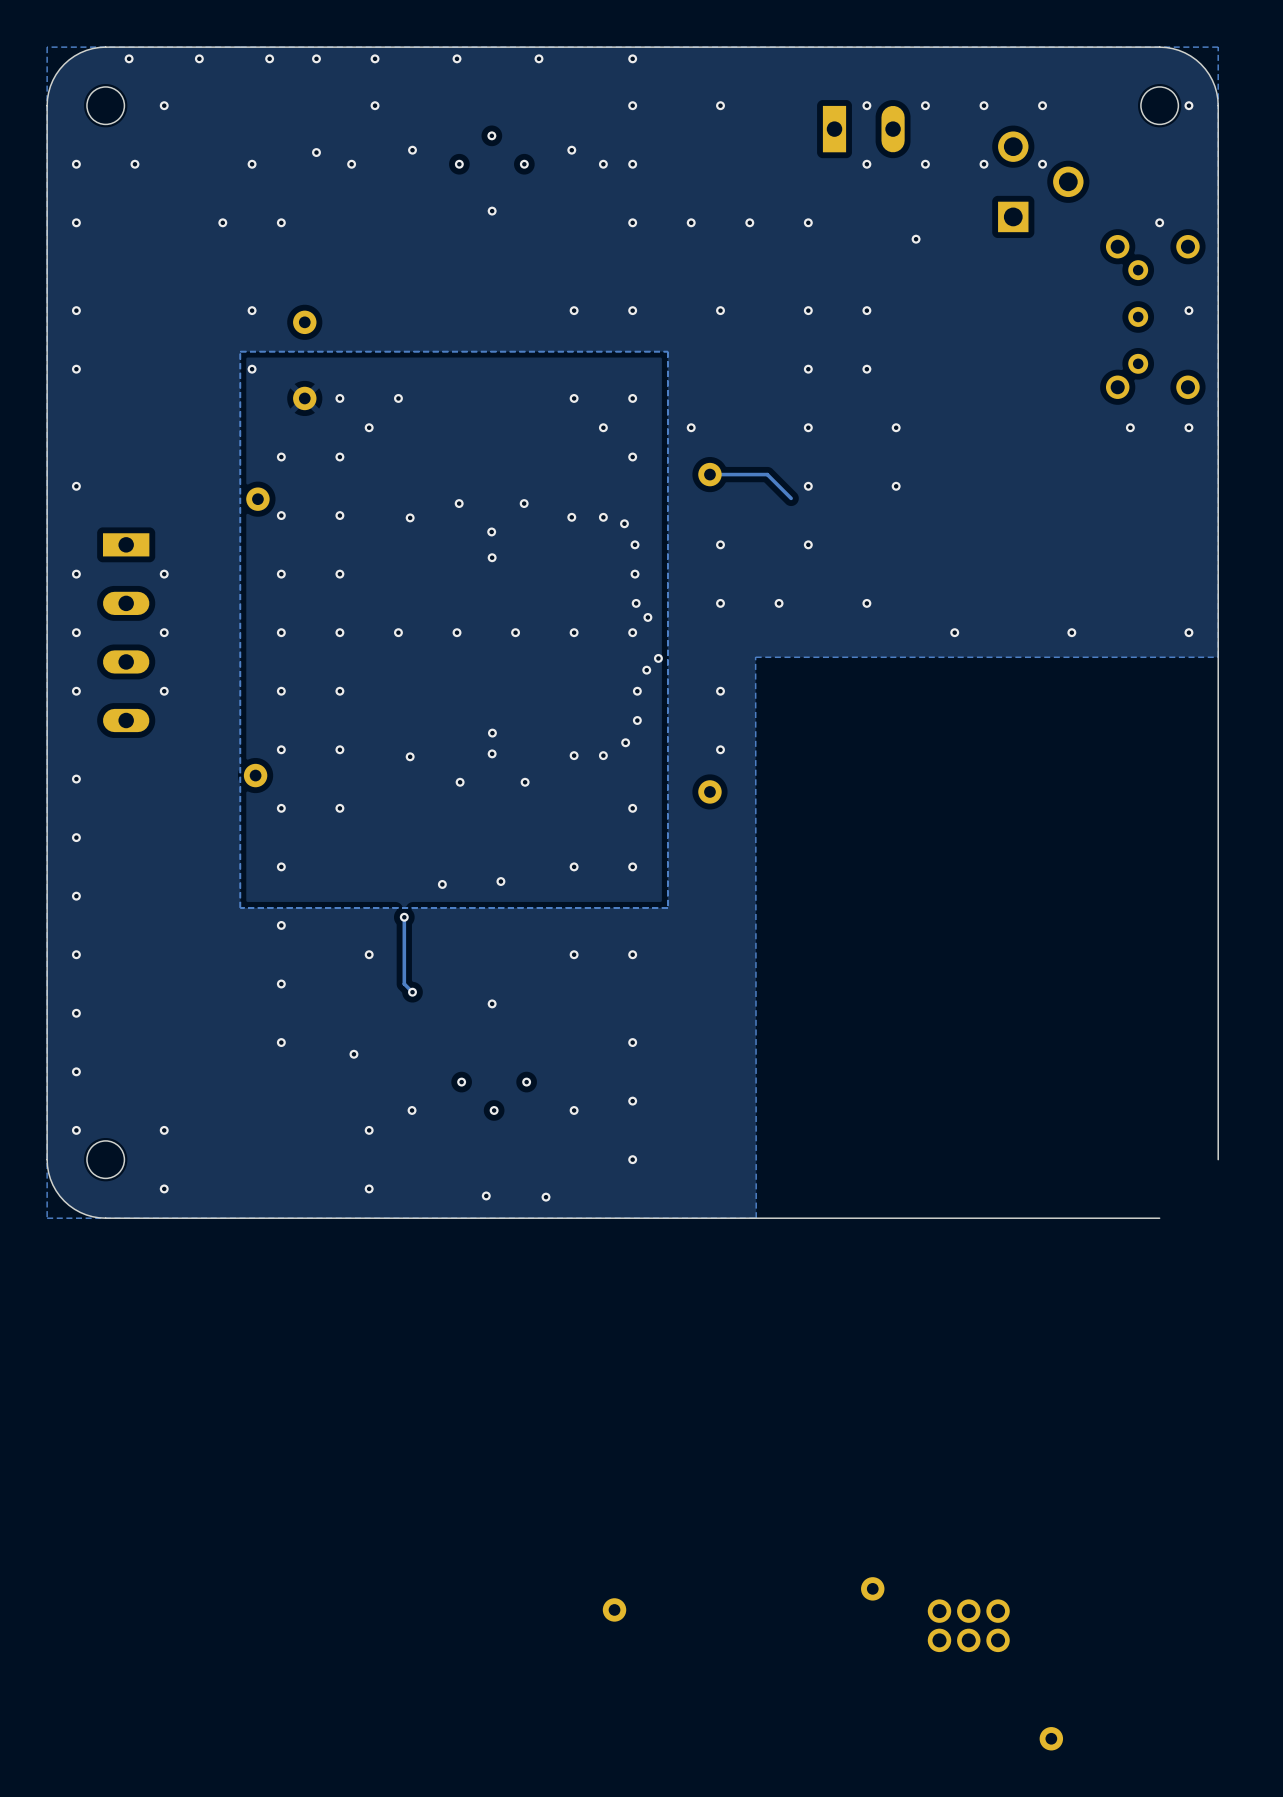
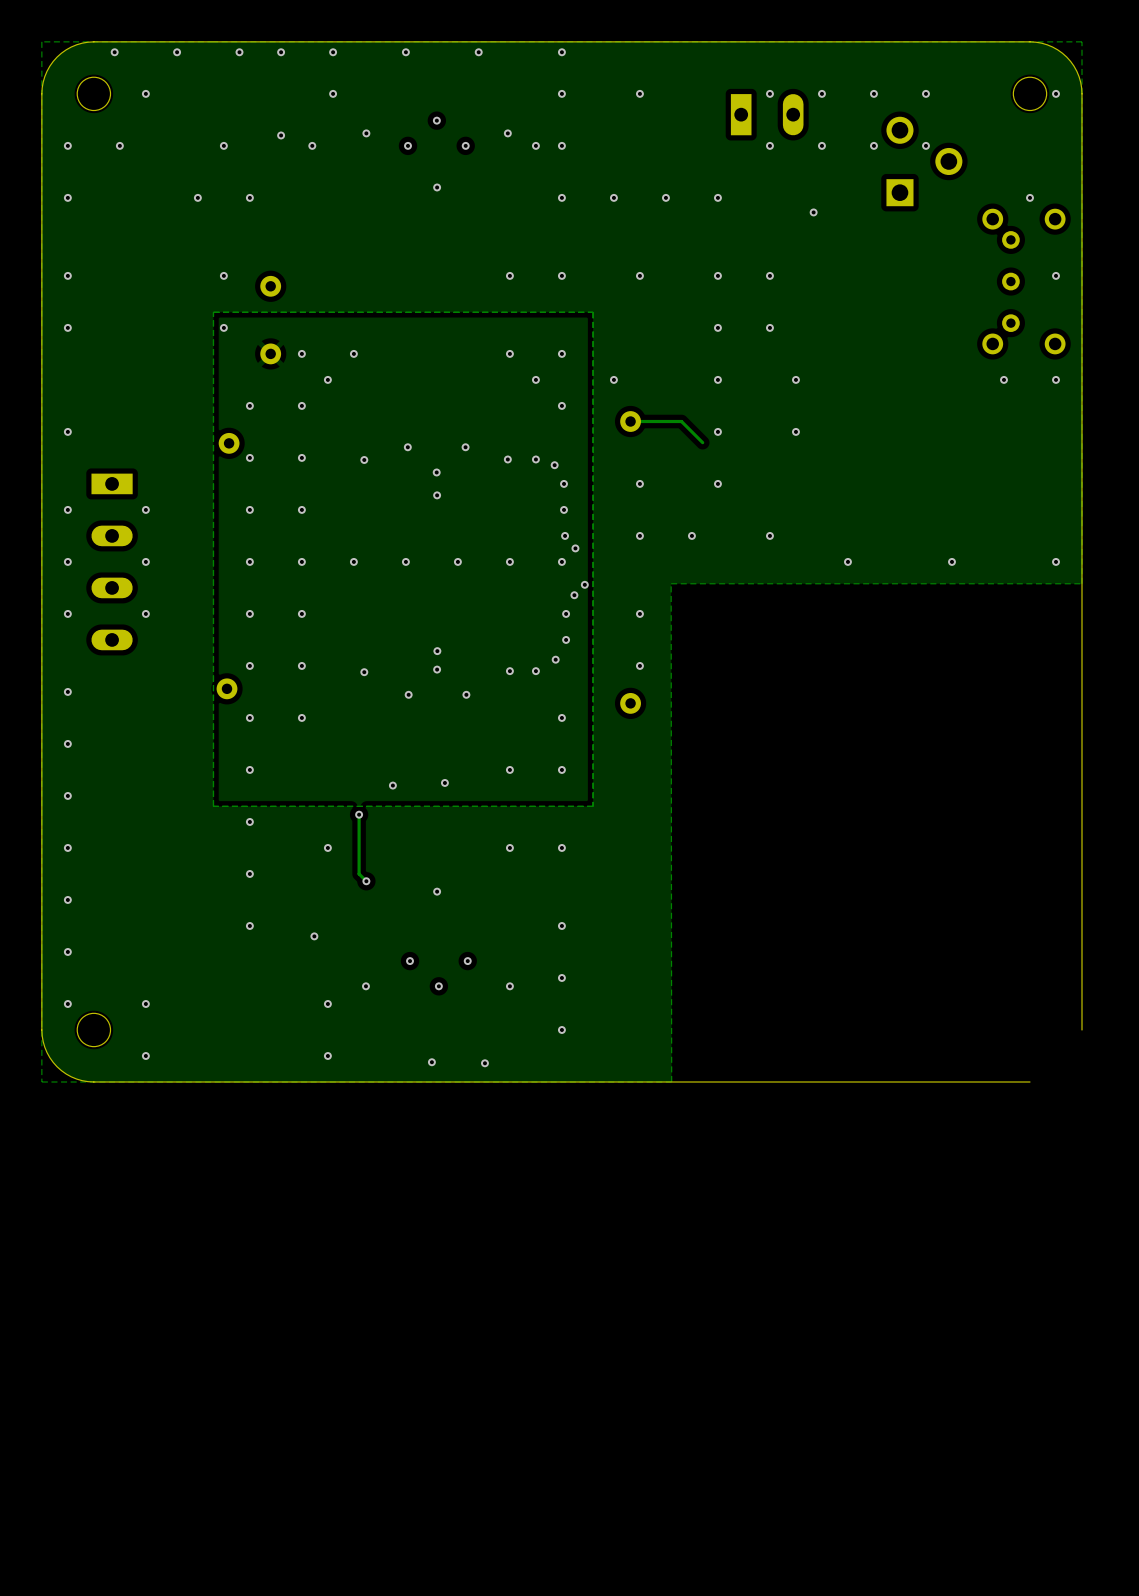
part: (872, 1588) -> none
part: (614, 1609) -> none
part: (968, 1625) -> none
part: (1051, 1738) -> none

